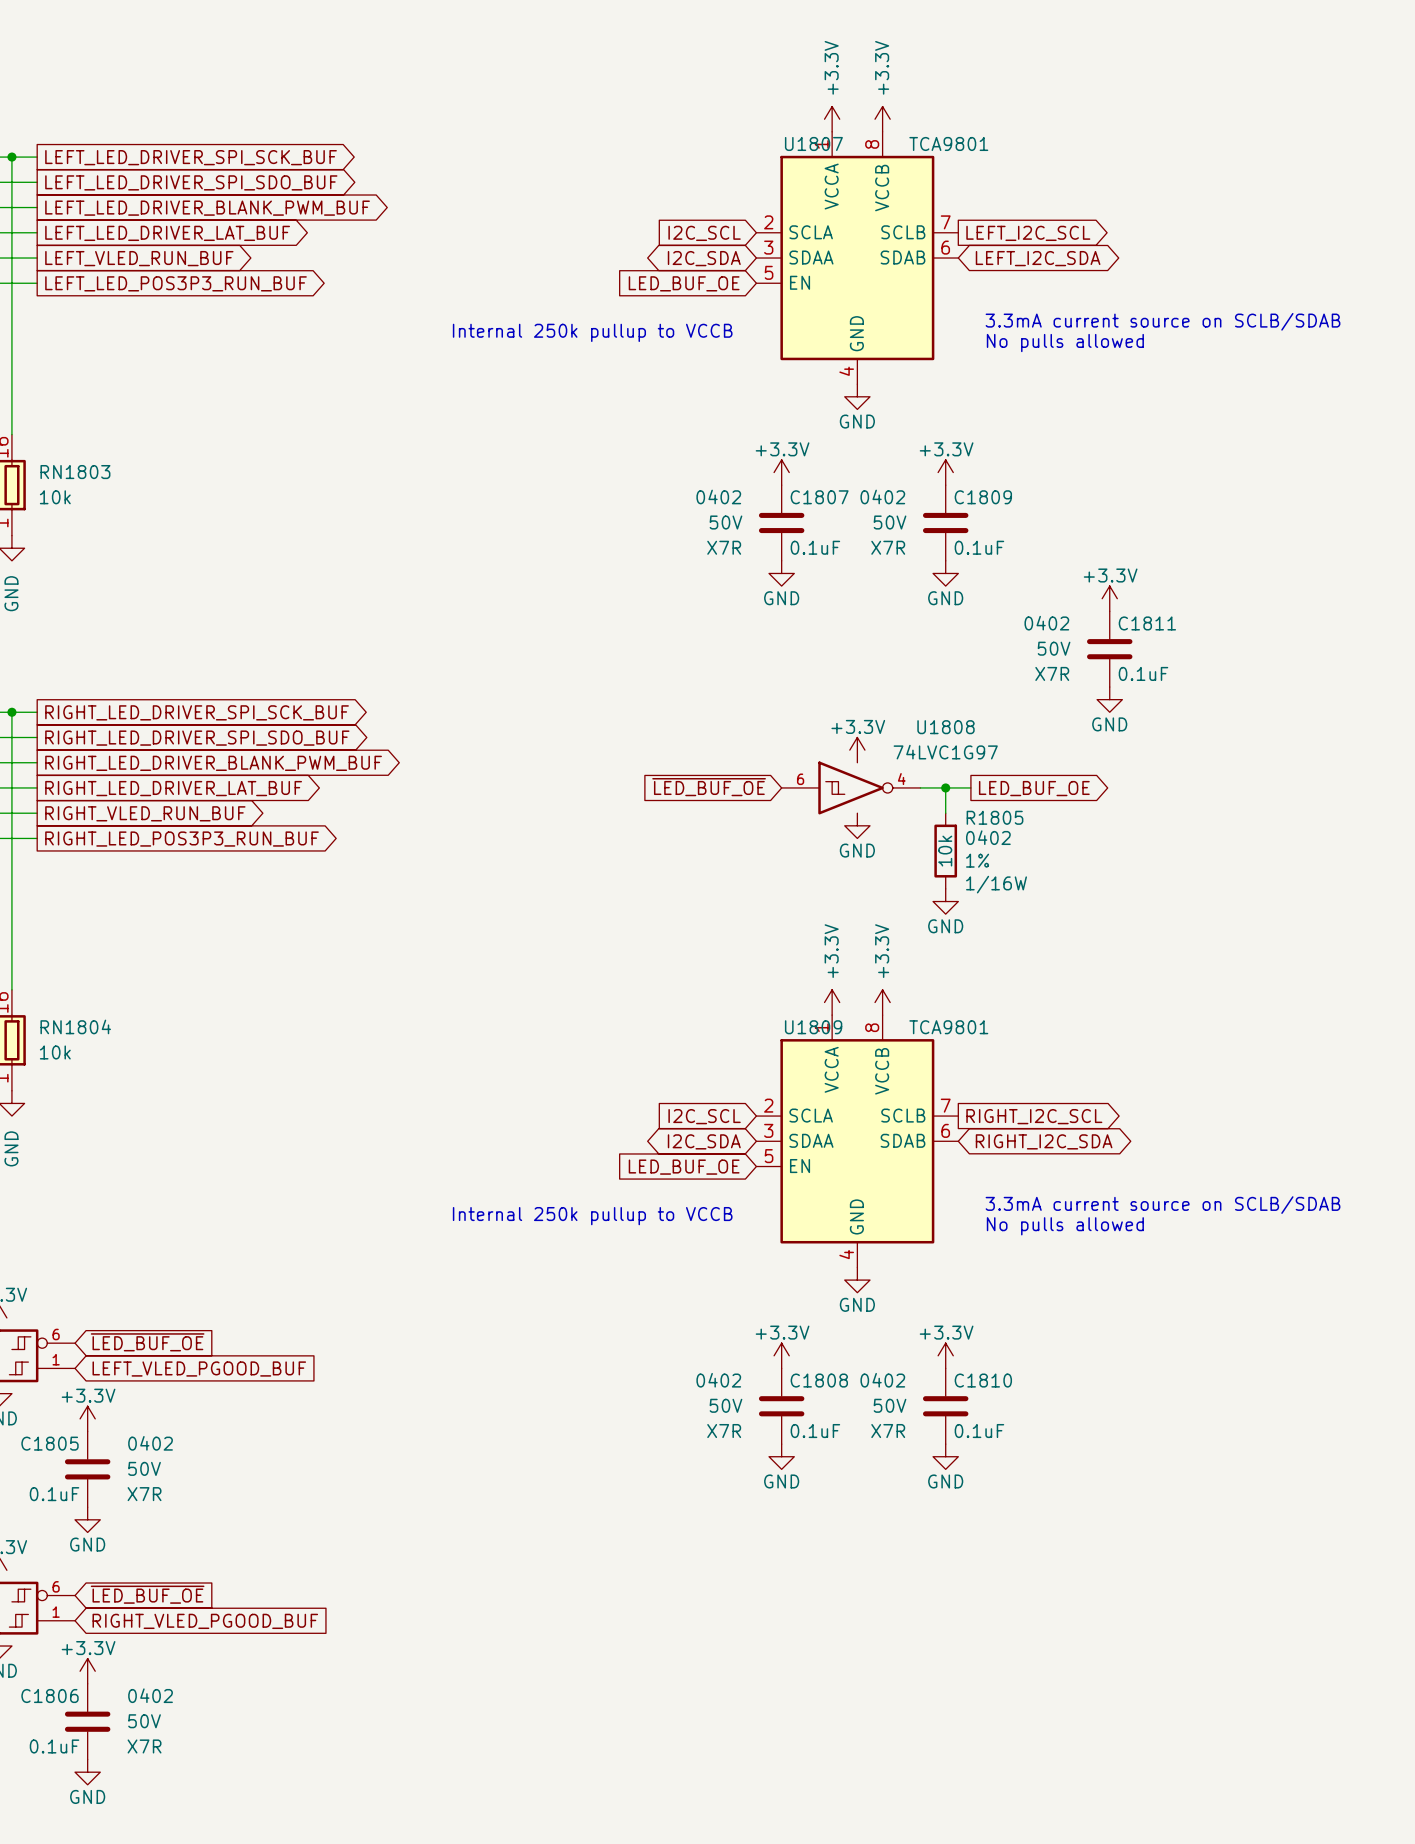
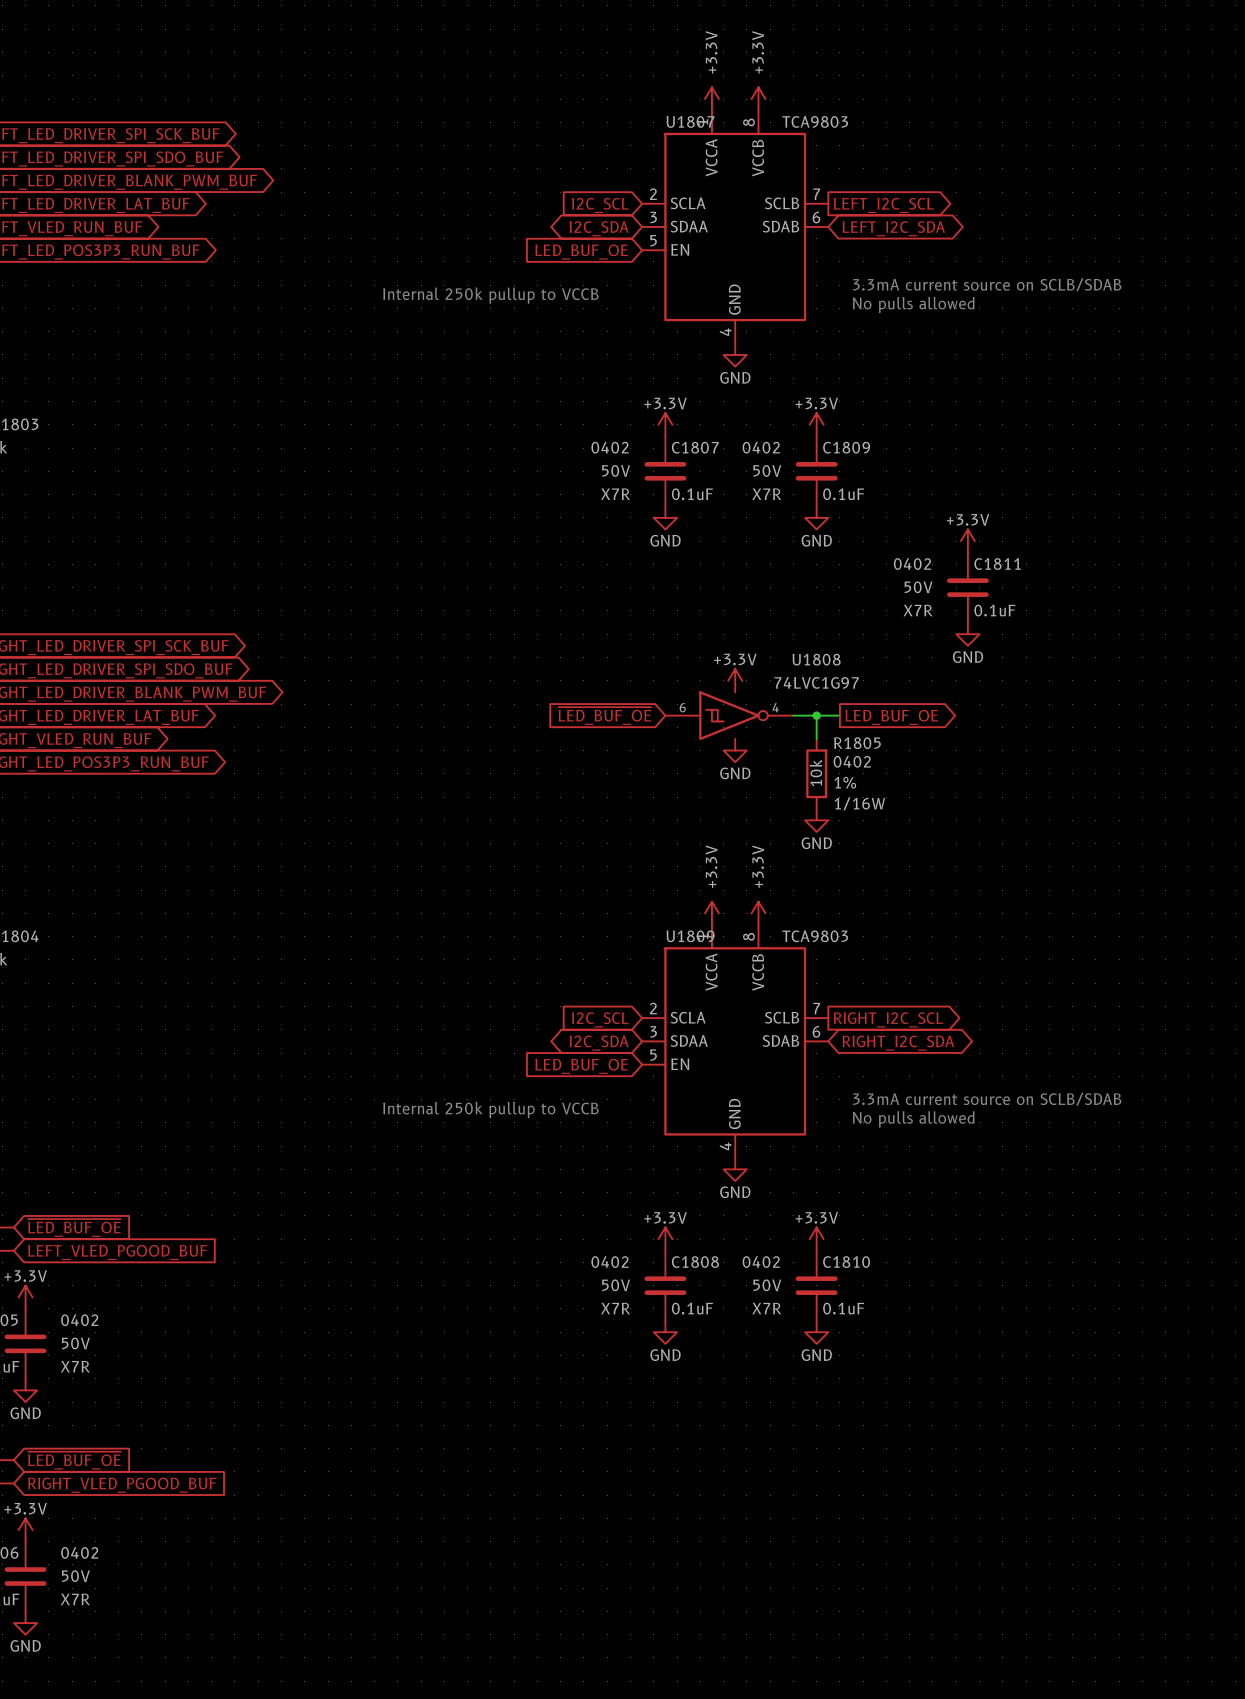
U1807 value: TCA9801 (948, 143) -> TCA9803 (815, 121)
U1809 value: TCA9801 (948, 1027) -> TCA9803 (815, 936)

